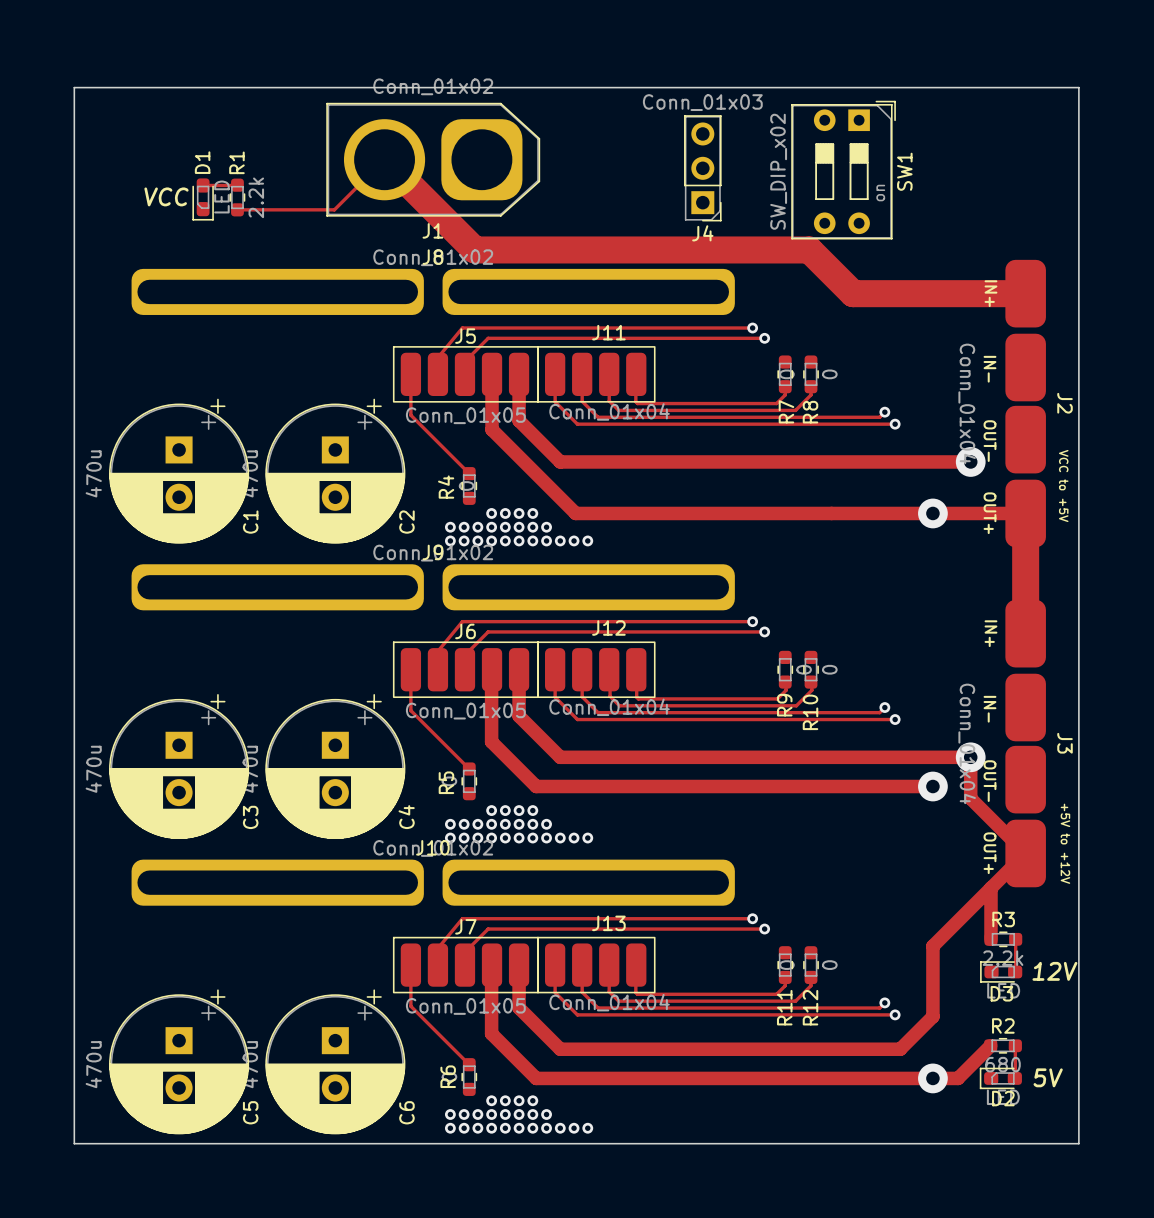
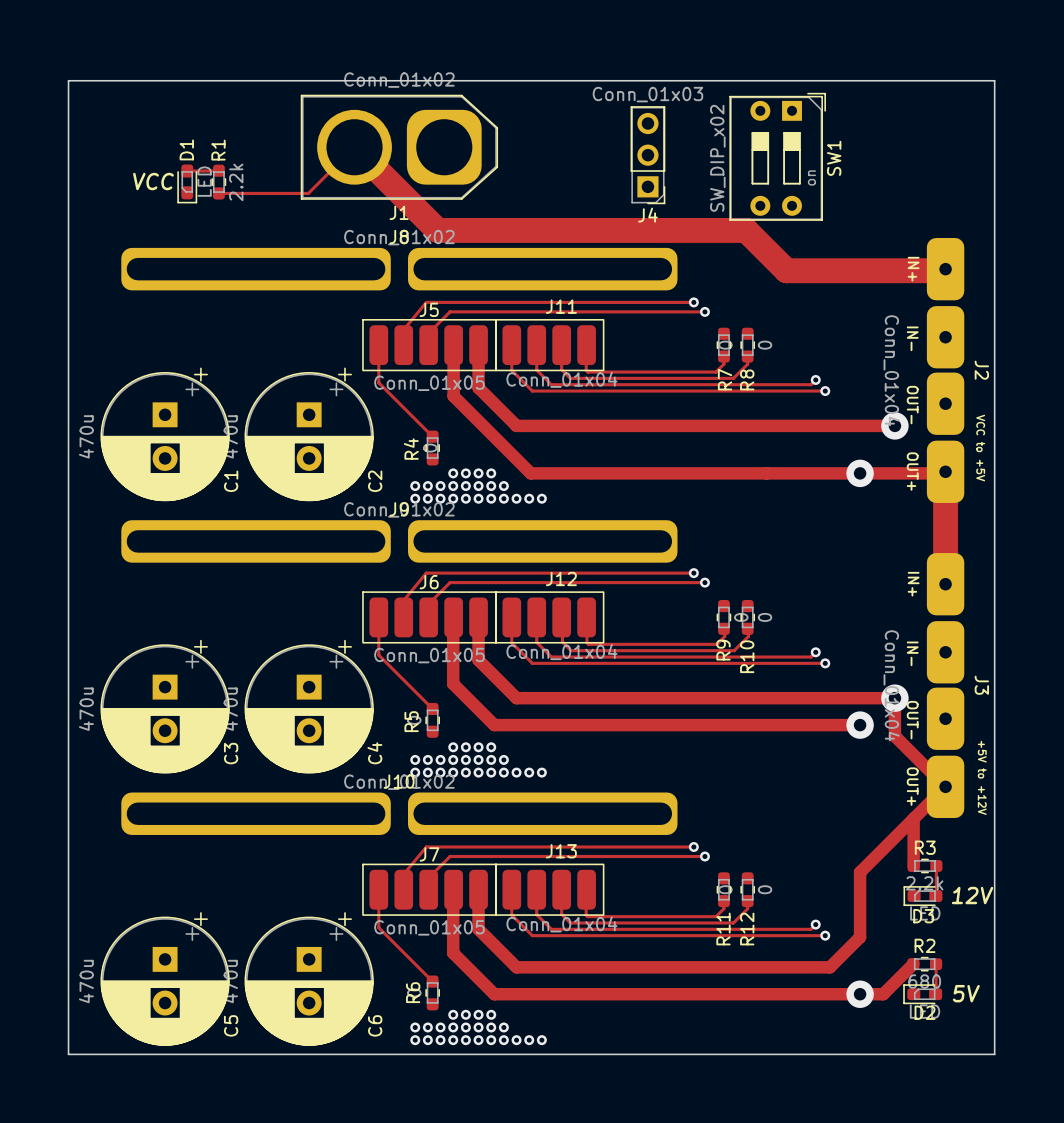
J2 footprint: [1005, 259, 1046, 548] -> [926, 237, 965, 503]
J3 footprint: [1005, 599, 1046, 888] -> [926, 553, 965, 819]

